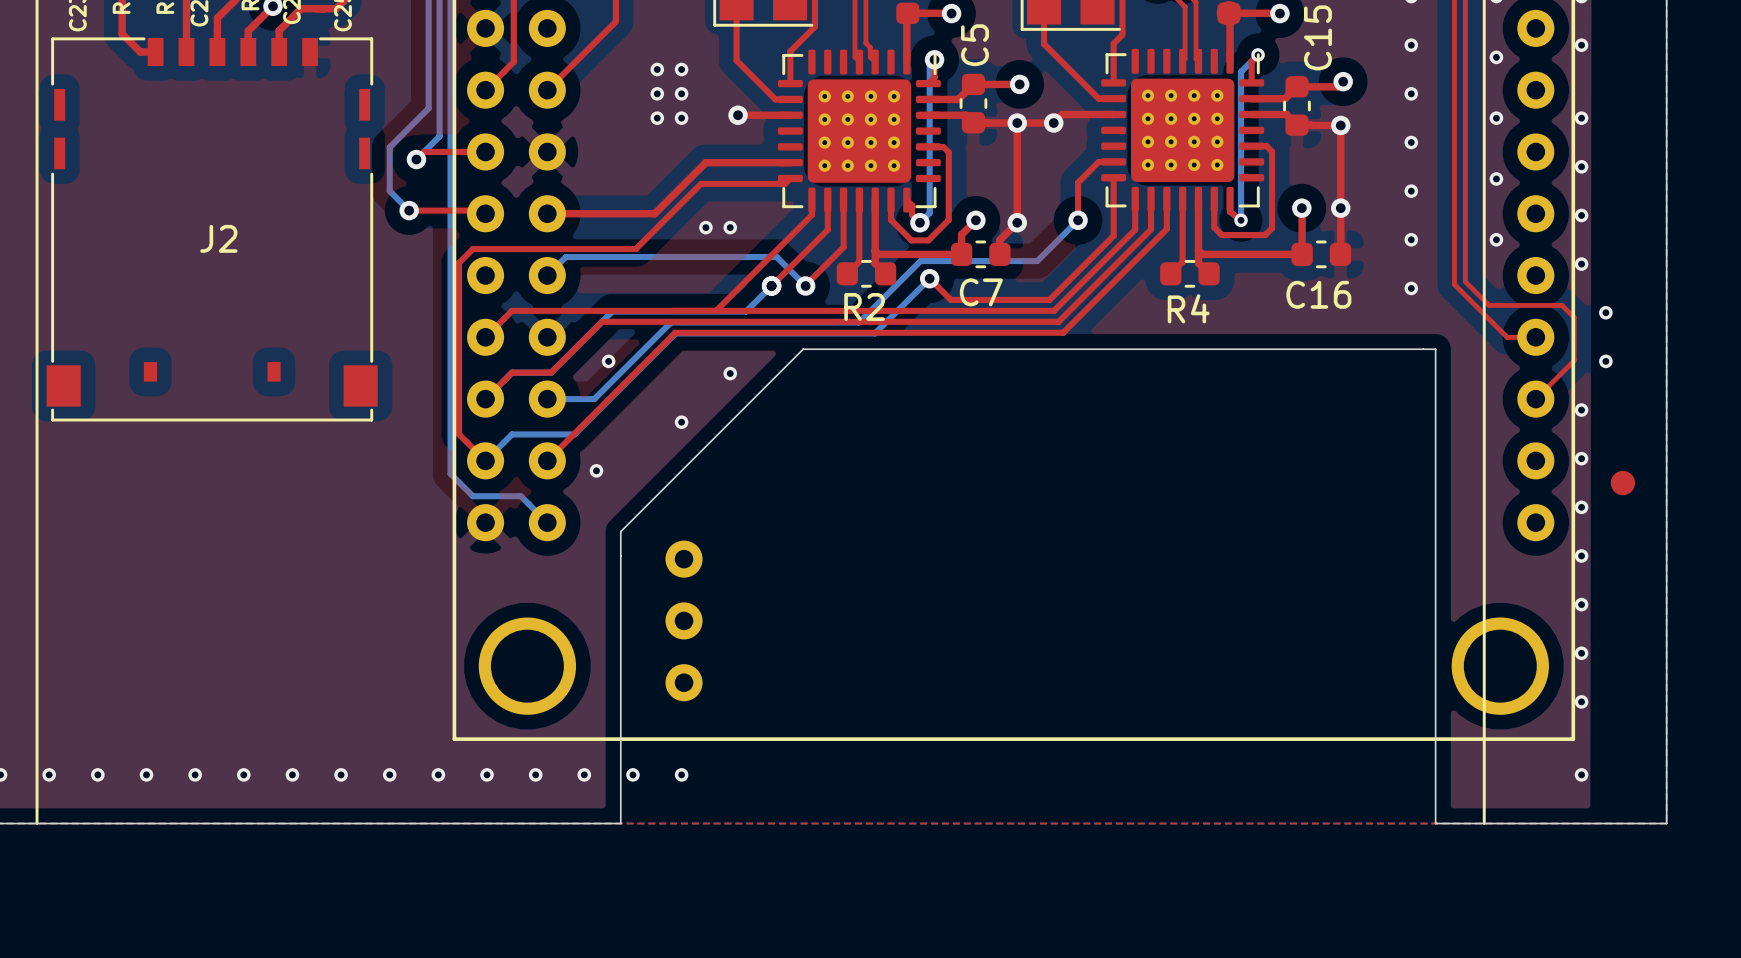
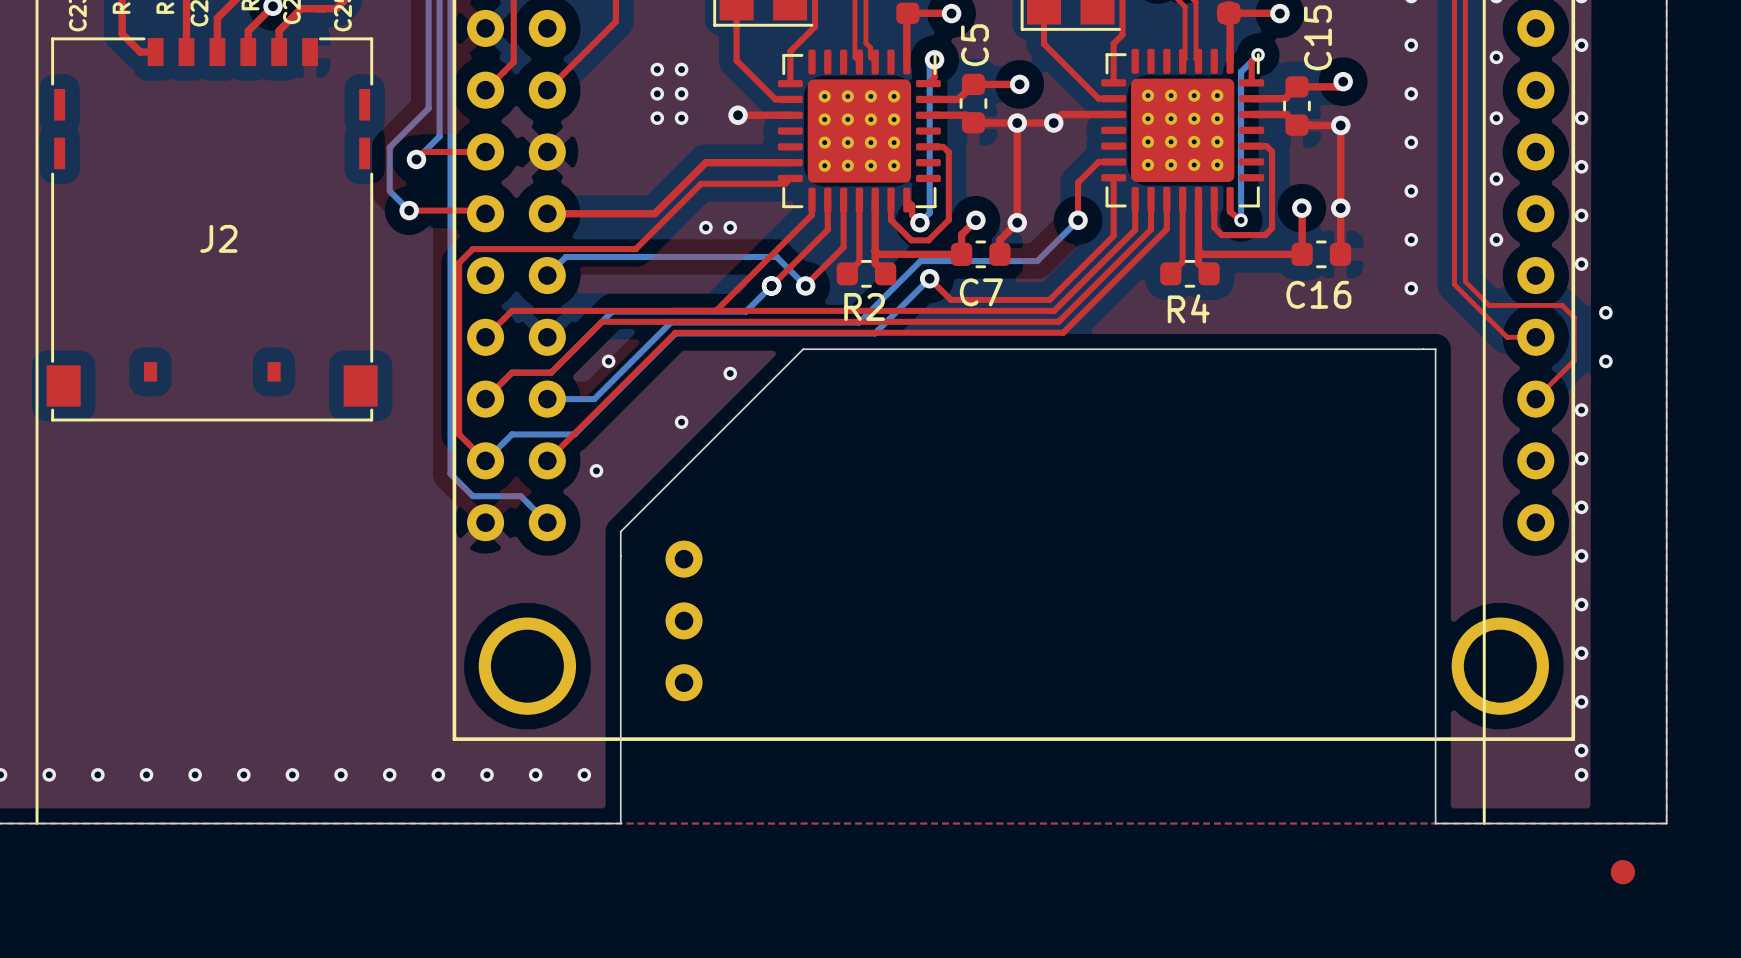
part position: (1622, 483) -> (1622, 872)
via: none -> (1581, 750)
via: (632, 774) -> none
via: (681, 774) -> none

